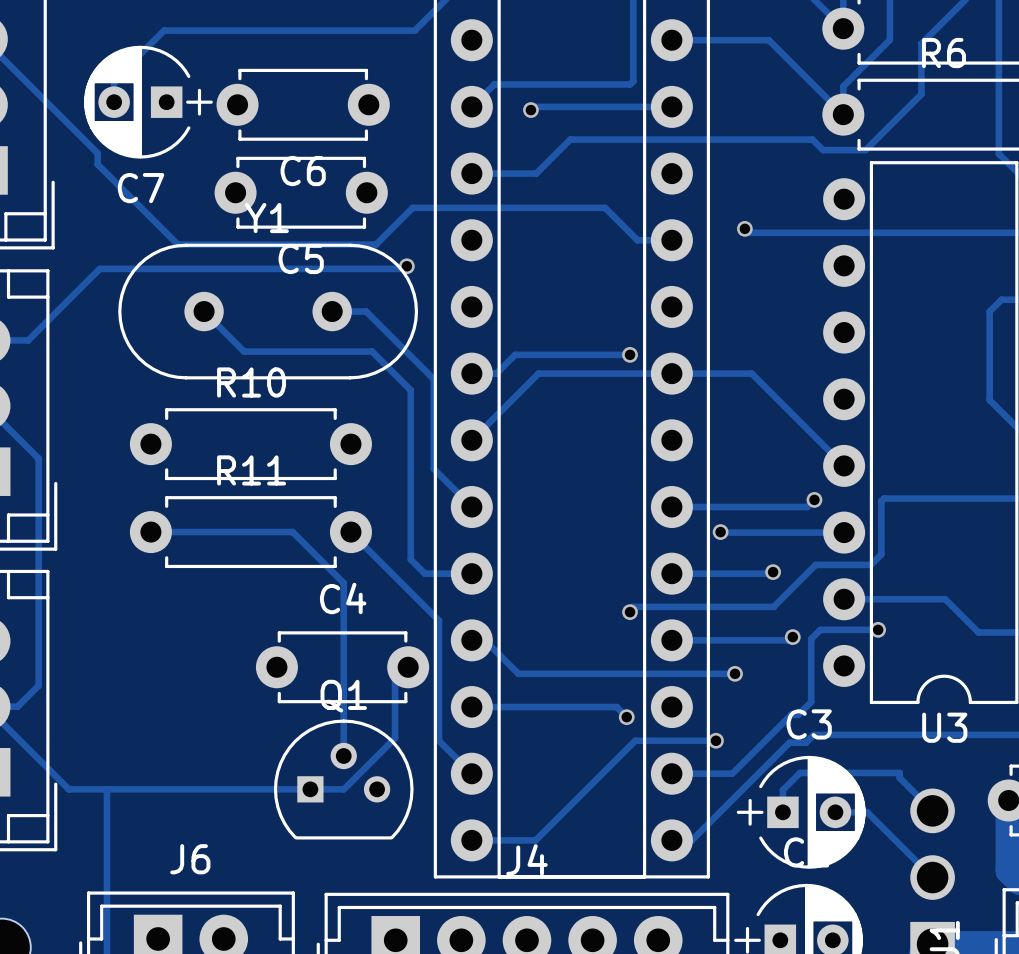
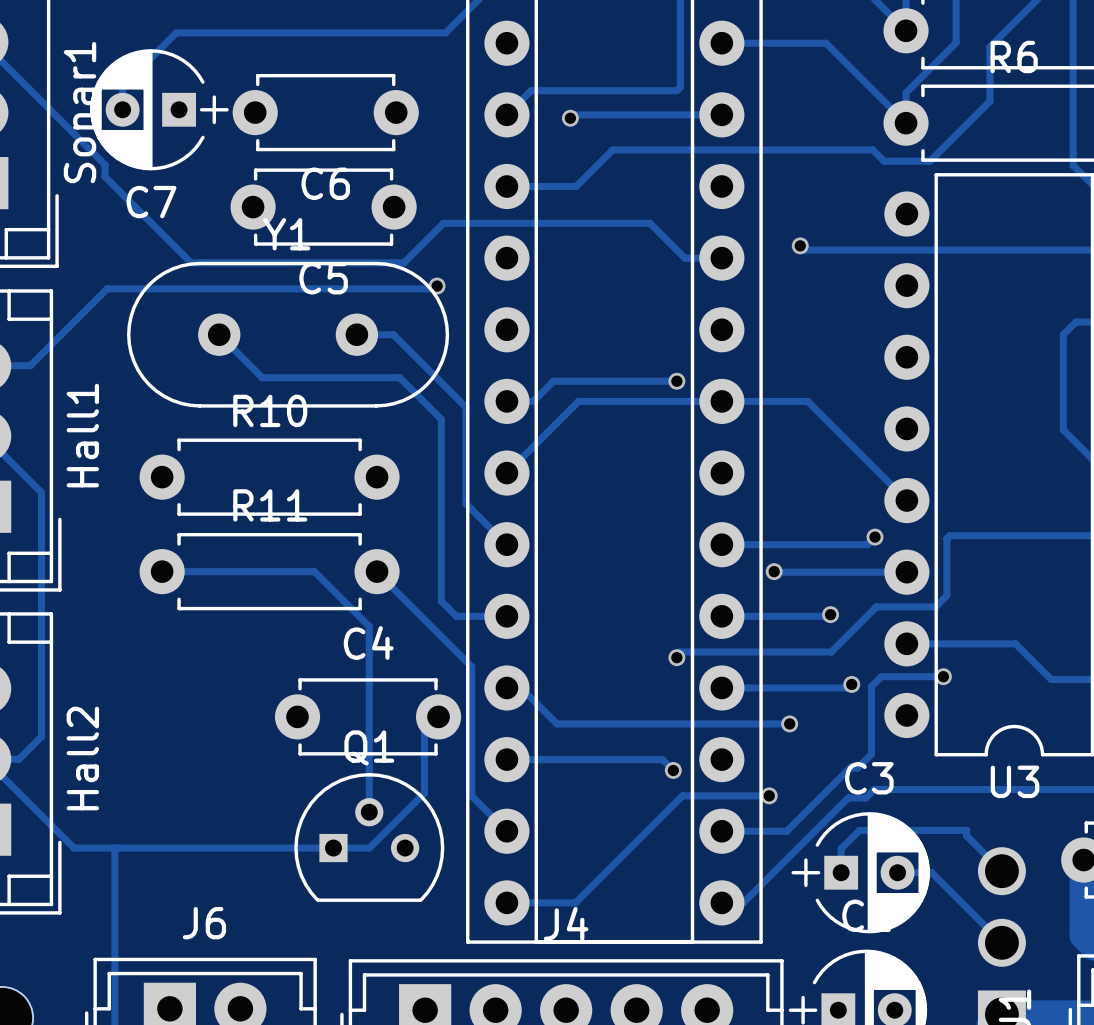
part value: none -> Sonar1 (79, 112)
part value: none -> Hall1 (82, 435)
part value: none -> Hall2 (82, 758)

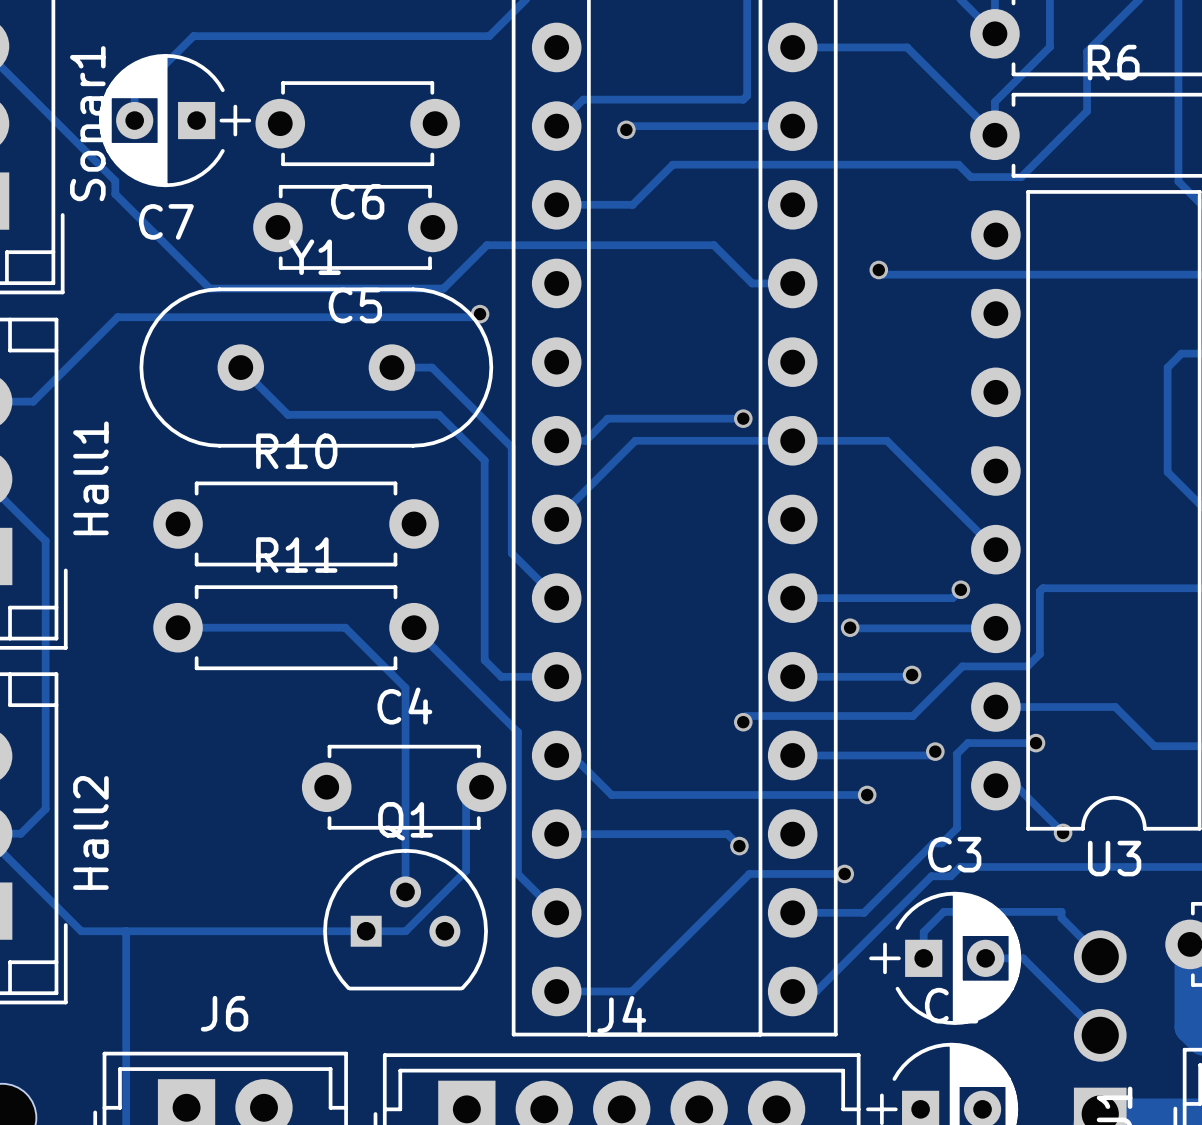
track: none -> (995, 785) (1015, 785) (1063, 832)
via: none -> (1063, 832)

